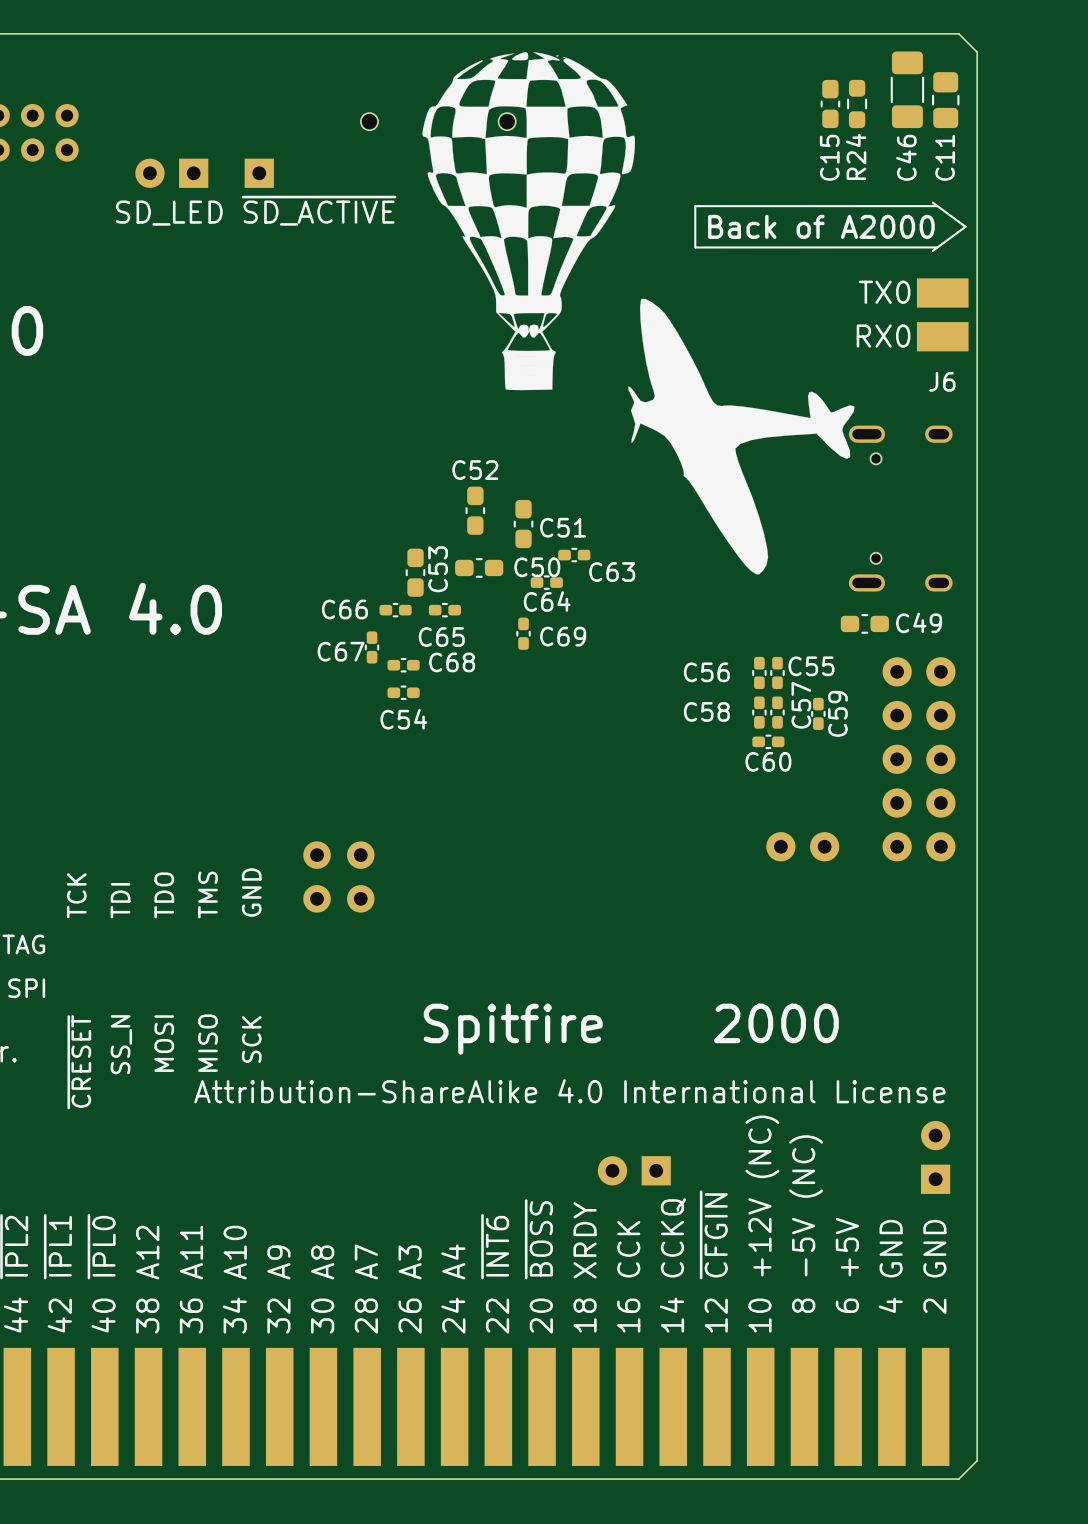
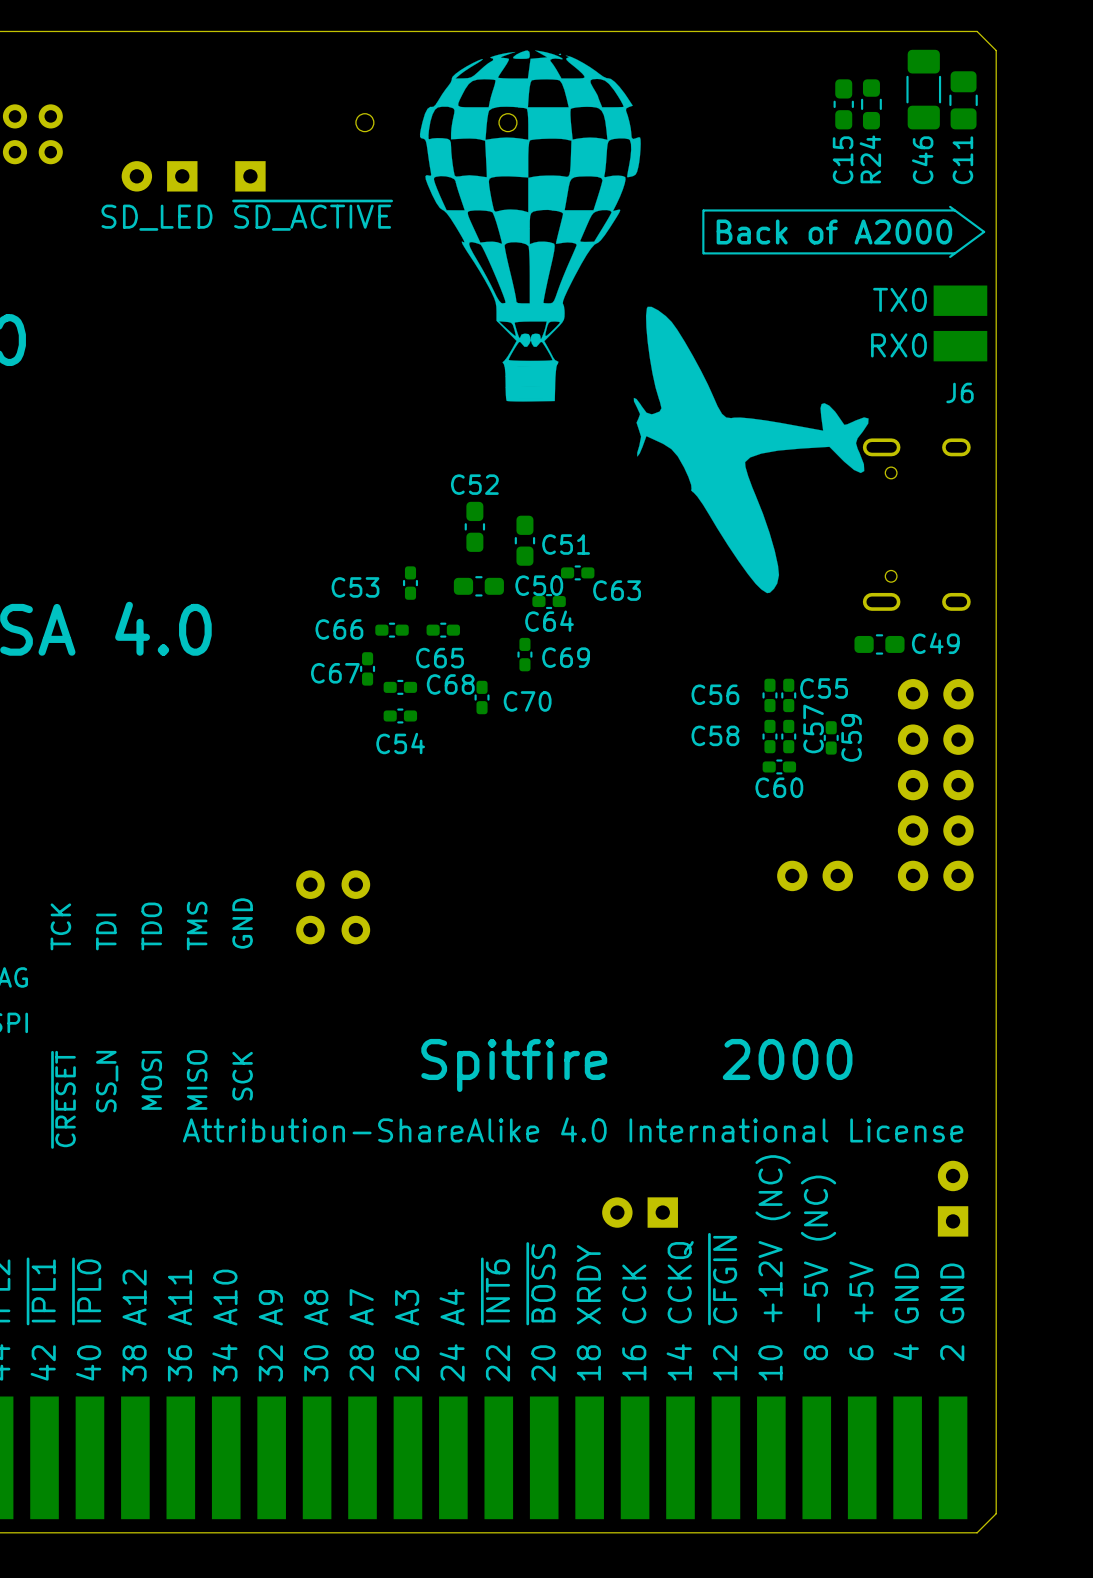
C53 footprint: [405, 548, 426, 597] -> [402, 566, 419, 600]
C53 name rotation: 0° (438, 569) -> 90° clockwise (355, 587)
C53 name position: C53 (438, 569) -> C53 (355, 587)
C70: none -> (482, 697)

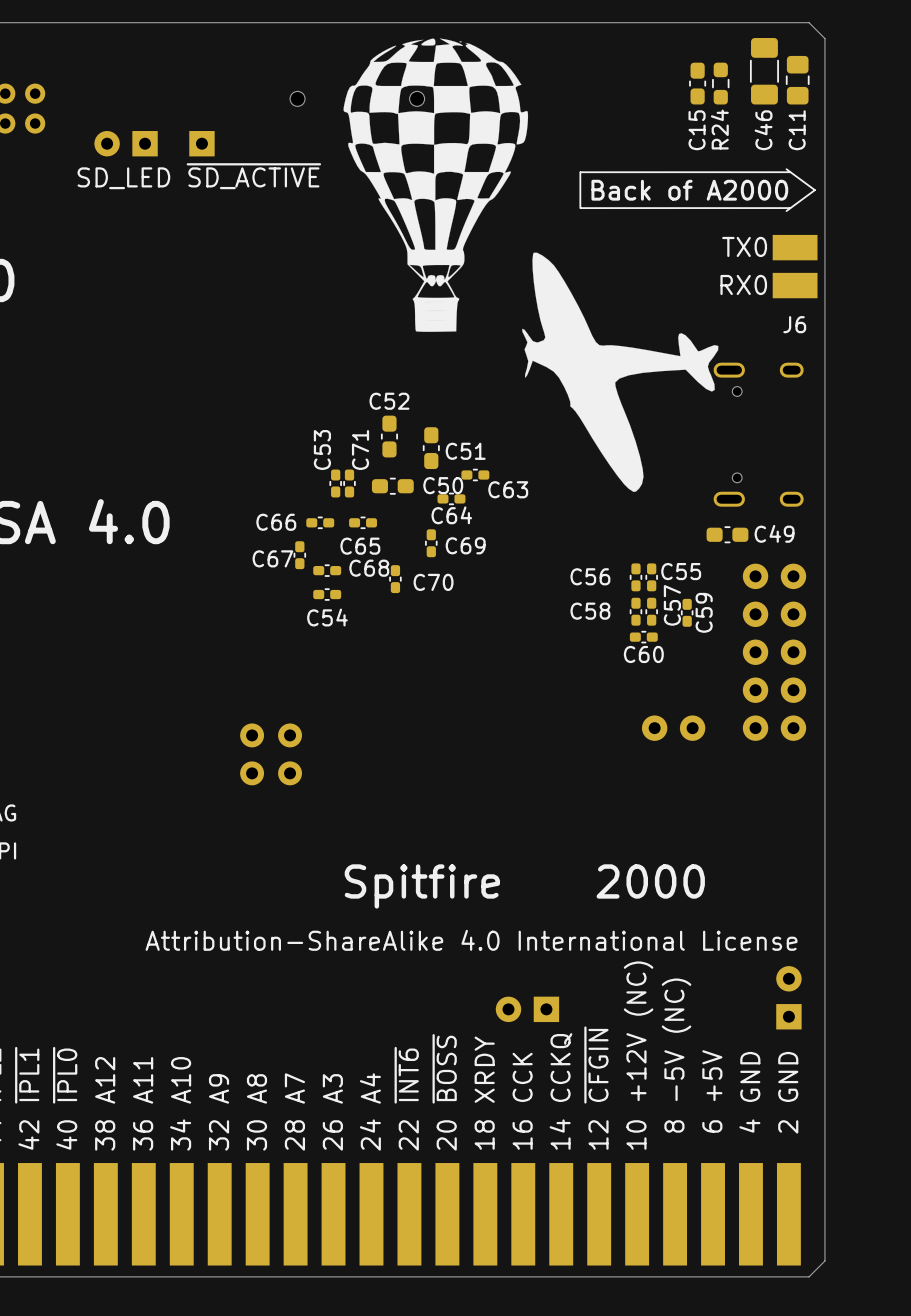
C71: none -> (349, 483)
C53 name rotation: 0° (355, 587) -> 90° counterclockwise (322, 449)
text: GND (242, 923) -> none
text: TCK (60, 926) -> none
text: TDO (151, 926) -> none
text: TMS (197, 926) -> none
text: TDI (106, 932) -> none
text: SCK (242, 1076) -> none
text: MISO (197, 1079) -> none
text: MOSI (151, 1080) -> none
text: SS_N (107, 1081) -> none
text: ~{CRESET} (63, 1099) -> none

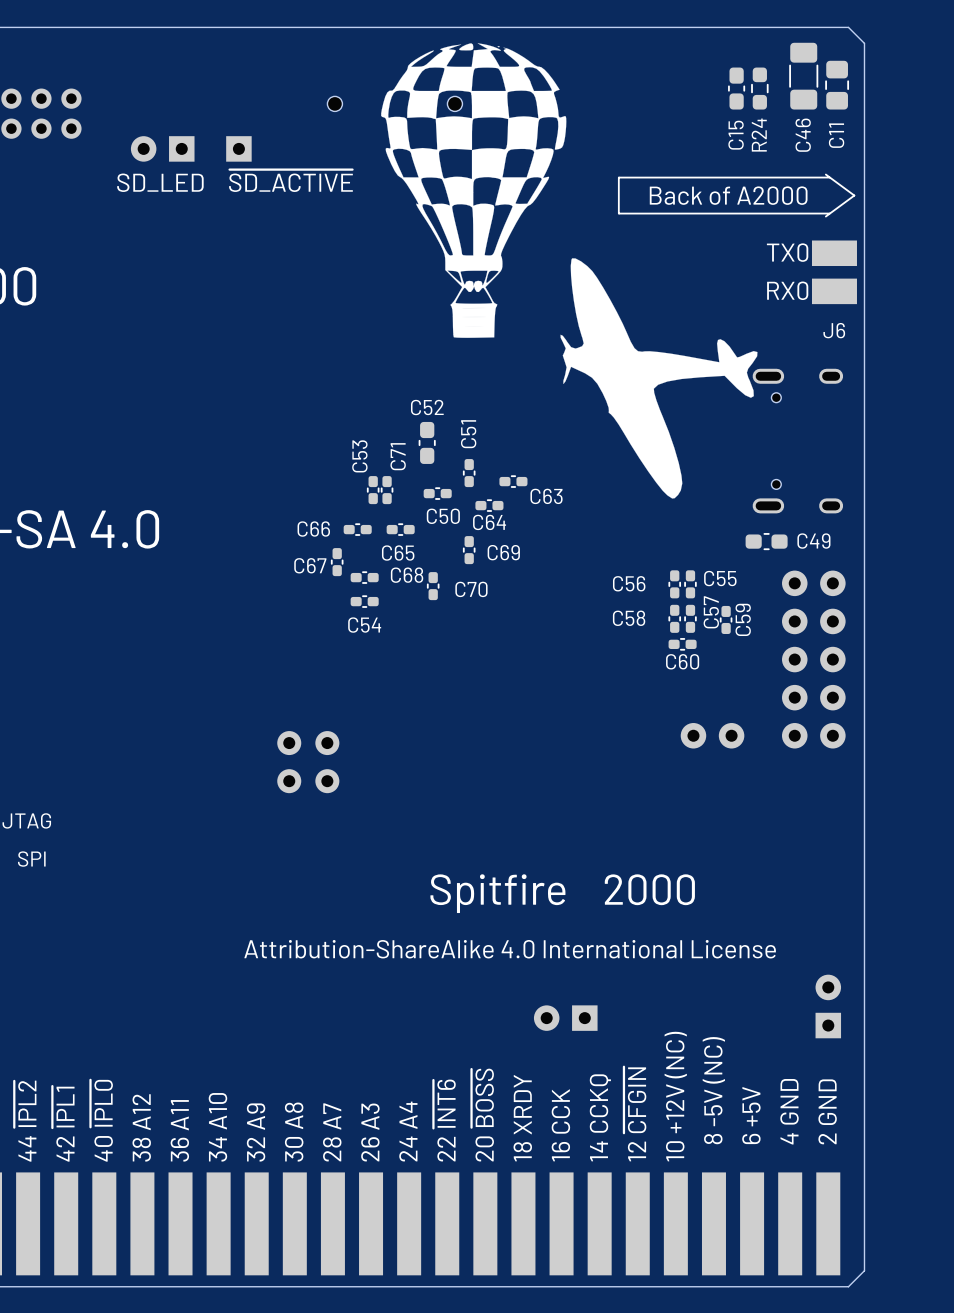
C51 footprint: [422, 427, 440, 470] -> [462, 459, 476, 488]
C51 name position: C51 (465, 451) -> C51 (468, 434)
C50 footprint: [371, 477, 414, 495] -> [423, 487, 452, 500]
C50 name position: C50 (443, 485) -> C50 (443, 516)

